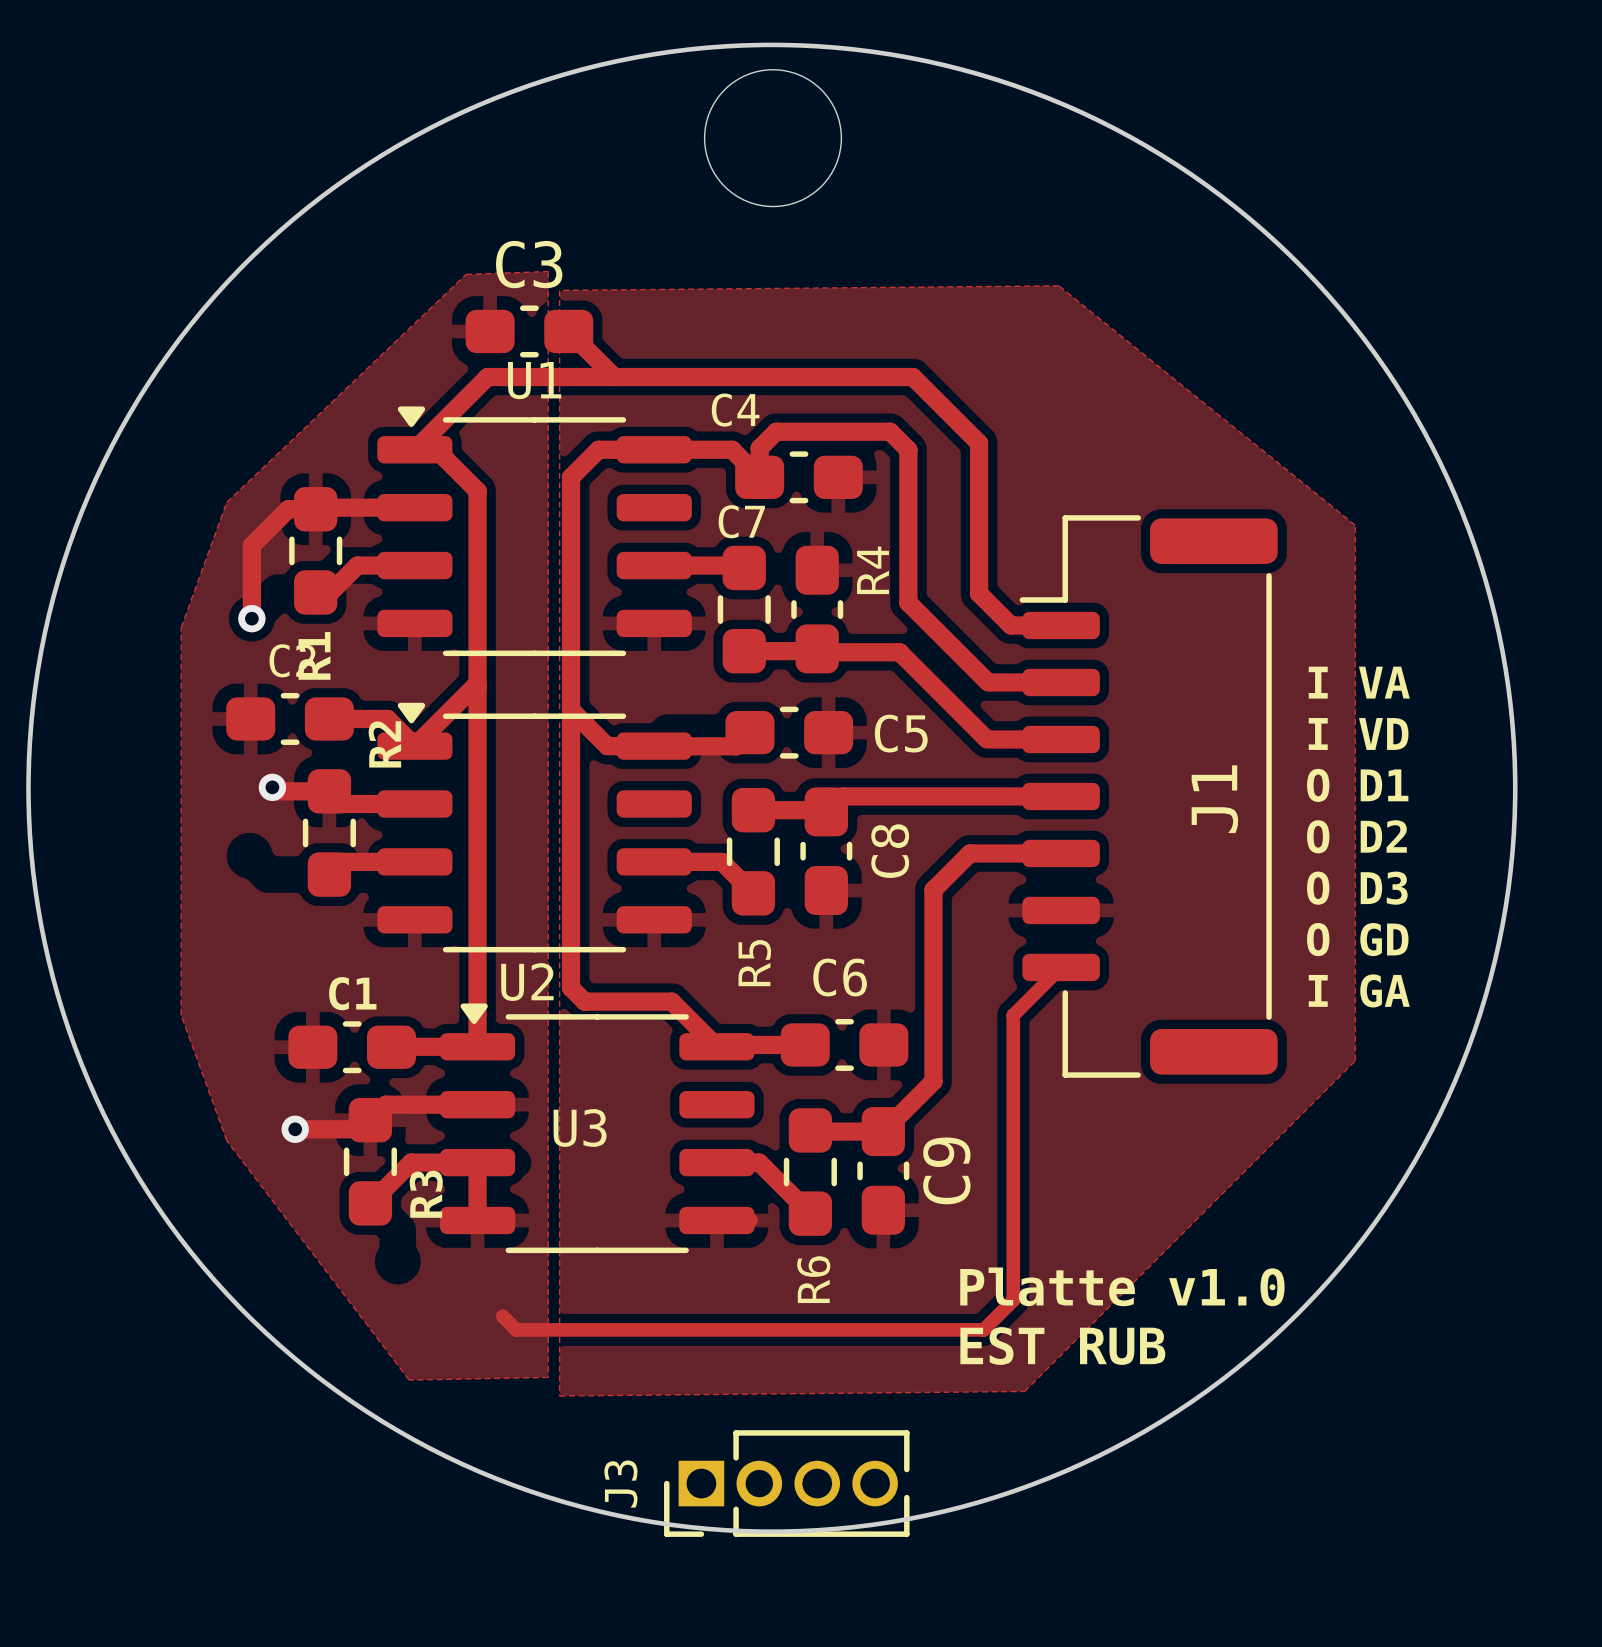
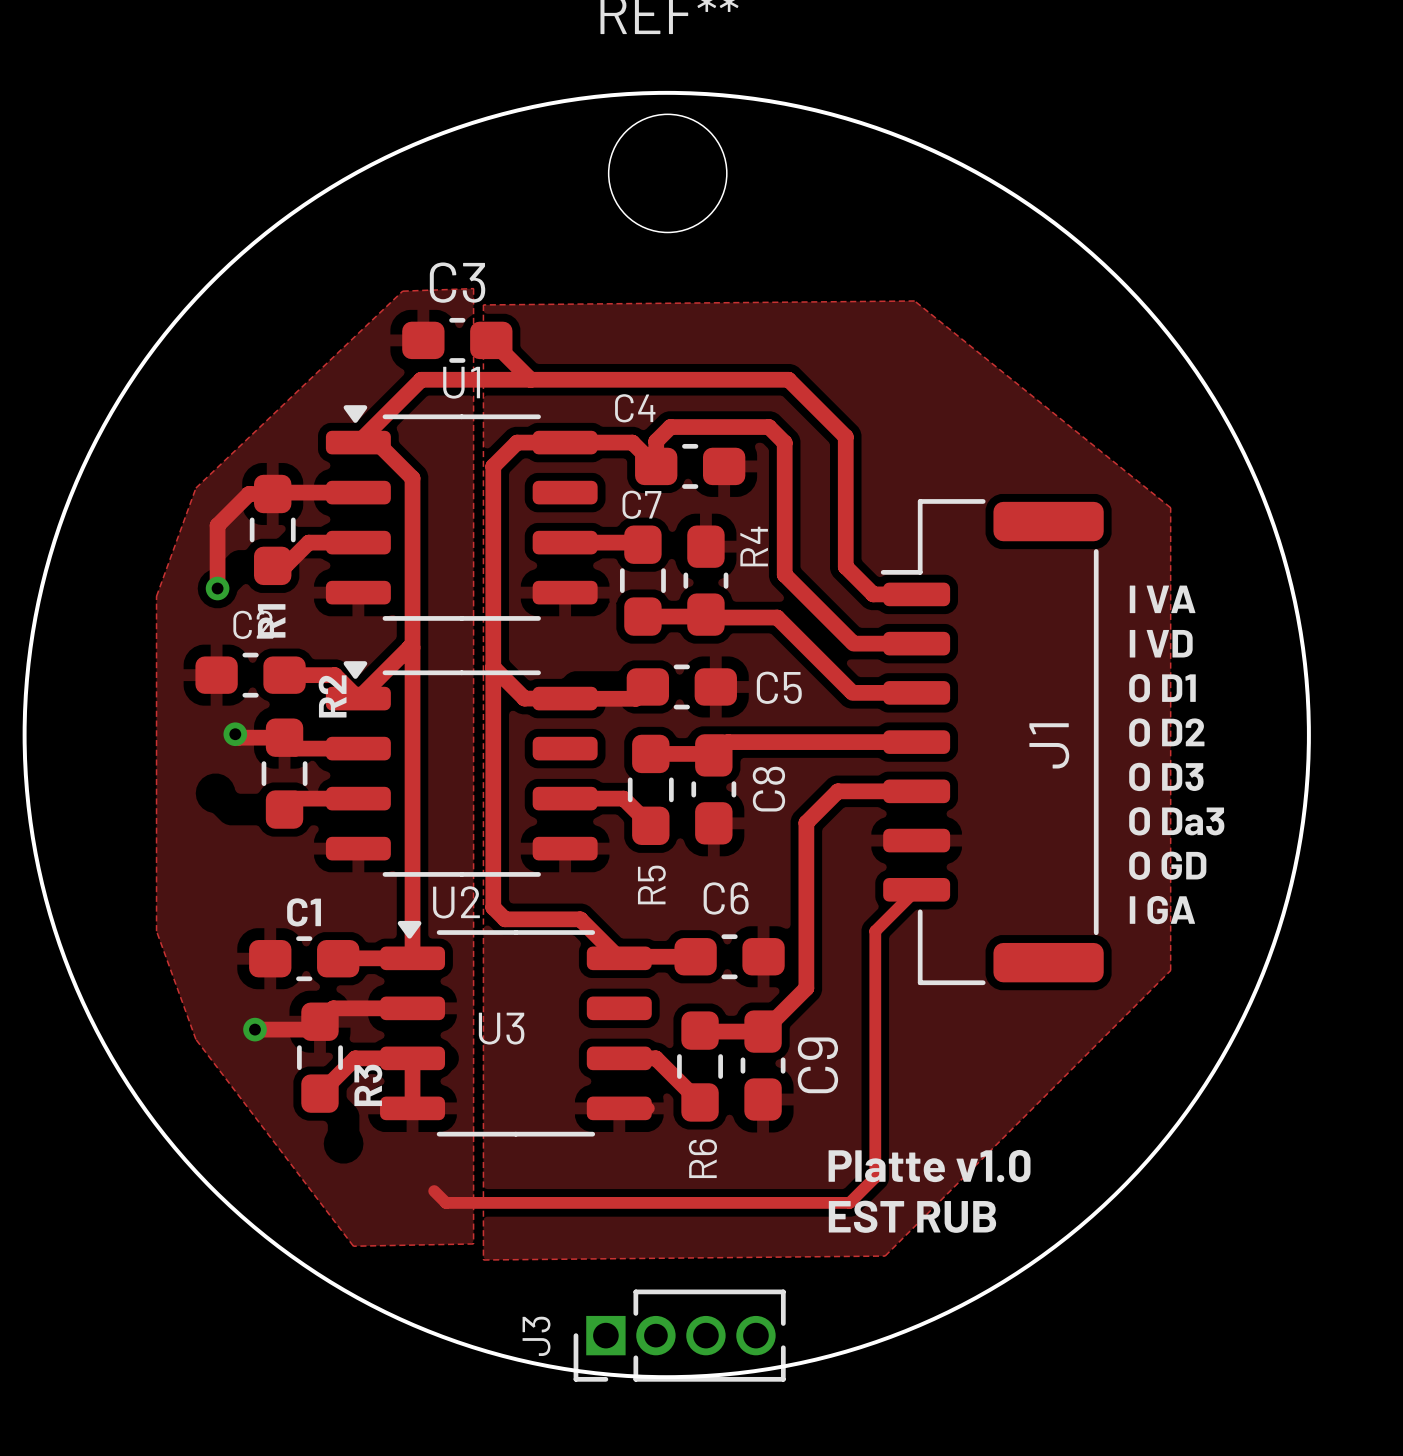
text: none -> I VA (1162, 599)
text: I VA (1359, 682) -> I VD (1161, 643)
text: I VD (1358, 733) -> O D1 (1162, 688)
text: O D1 (1357, 785) -> O D2 (1166, 732)
text: O D2 (1356, 836) -> O D3 (1166, 776)
text: O D3 (1357, 888) -> O Da3 (1176, 821)

